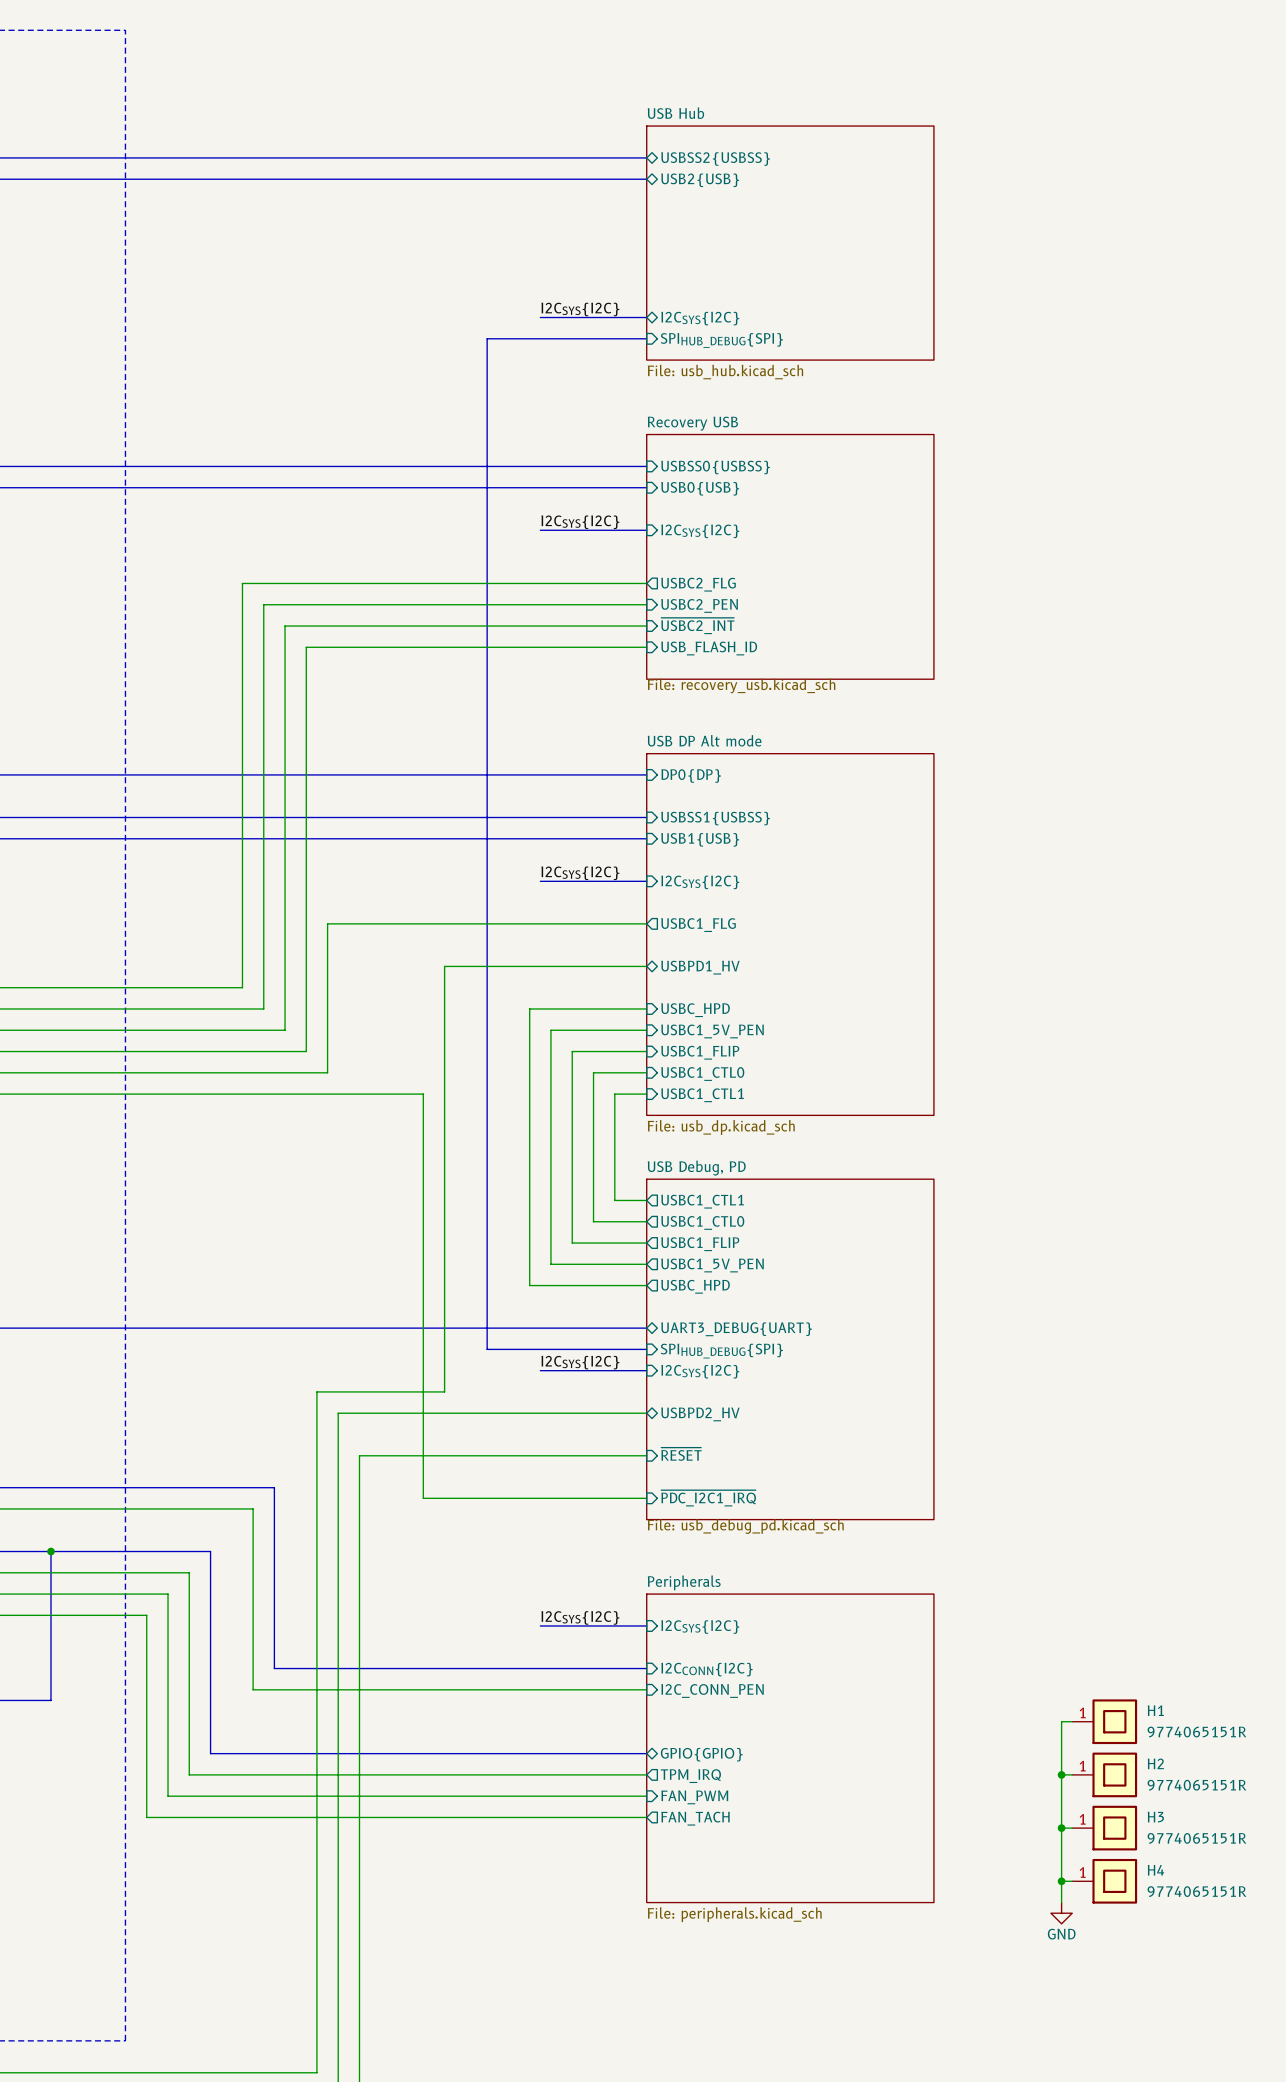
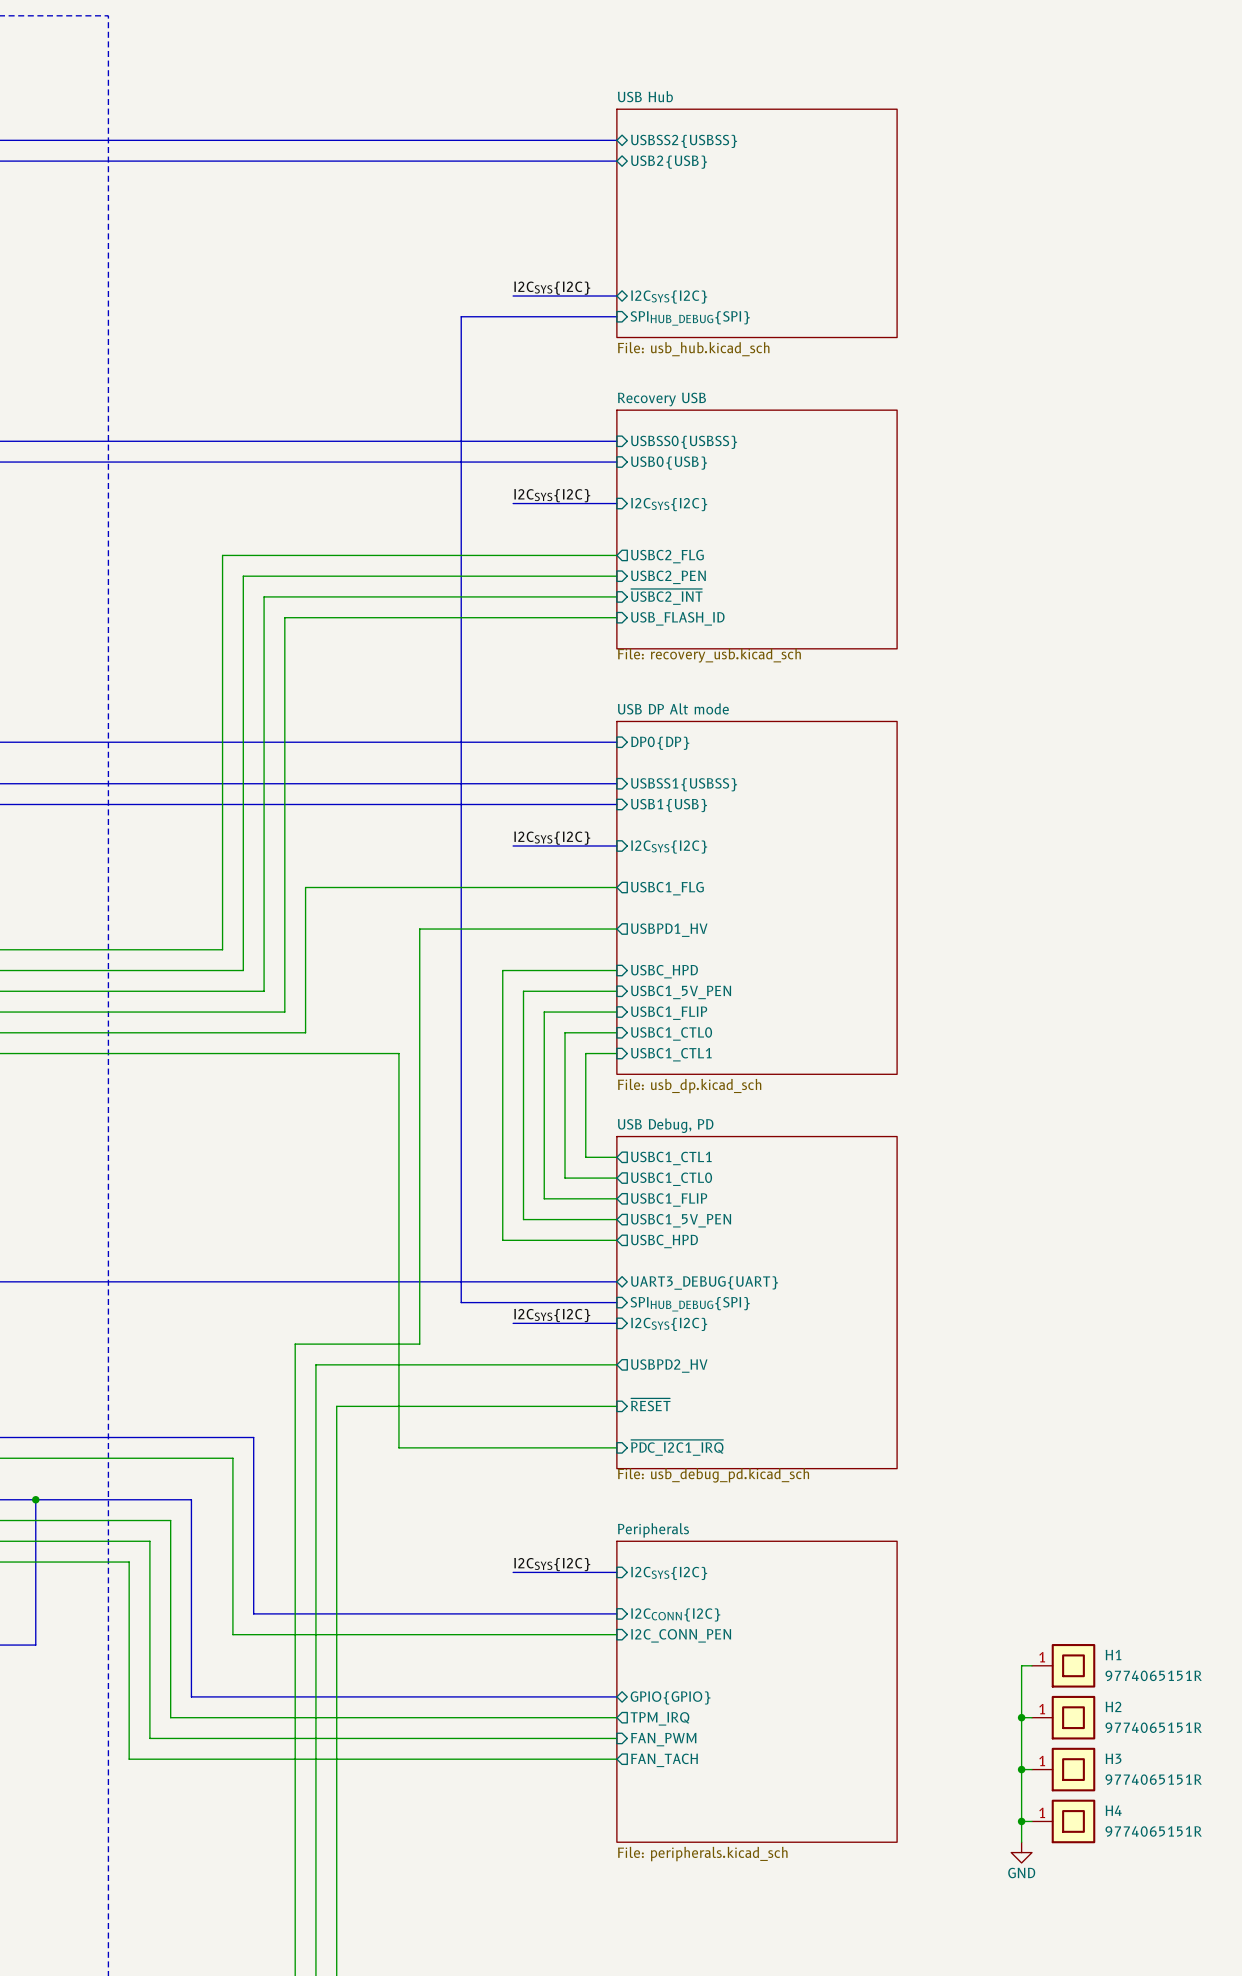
sheet pin shape: bidirectional (700, 967) -> output (669, 930)
sheet pin shape: bidirectional (700, 1414) -> output (669, 1366)

